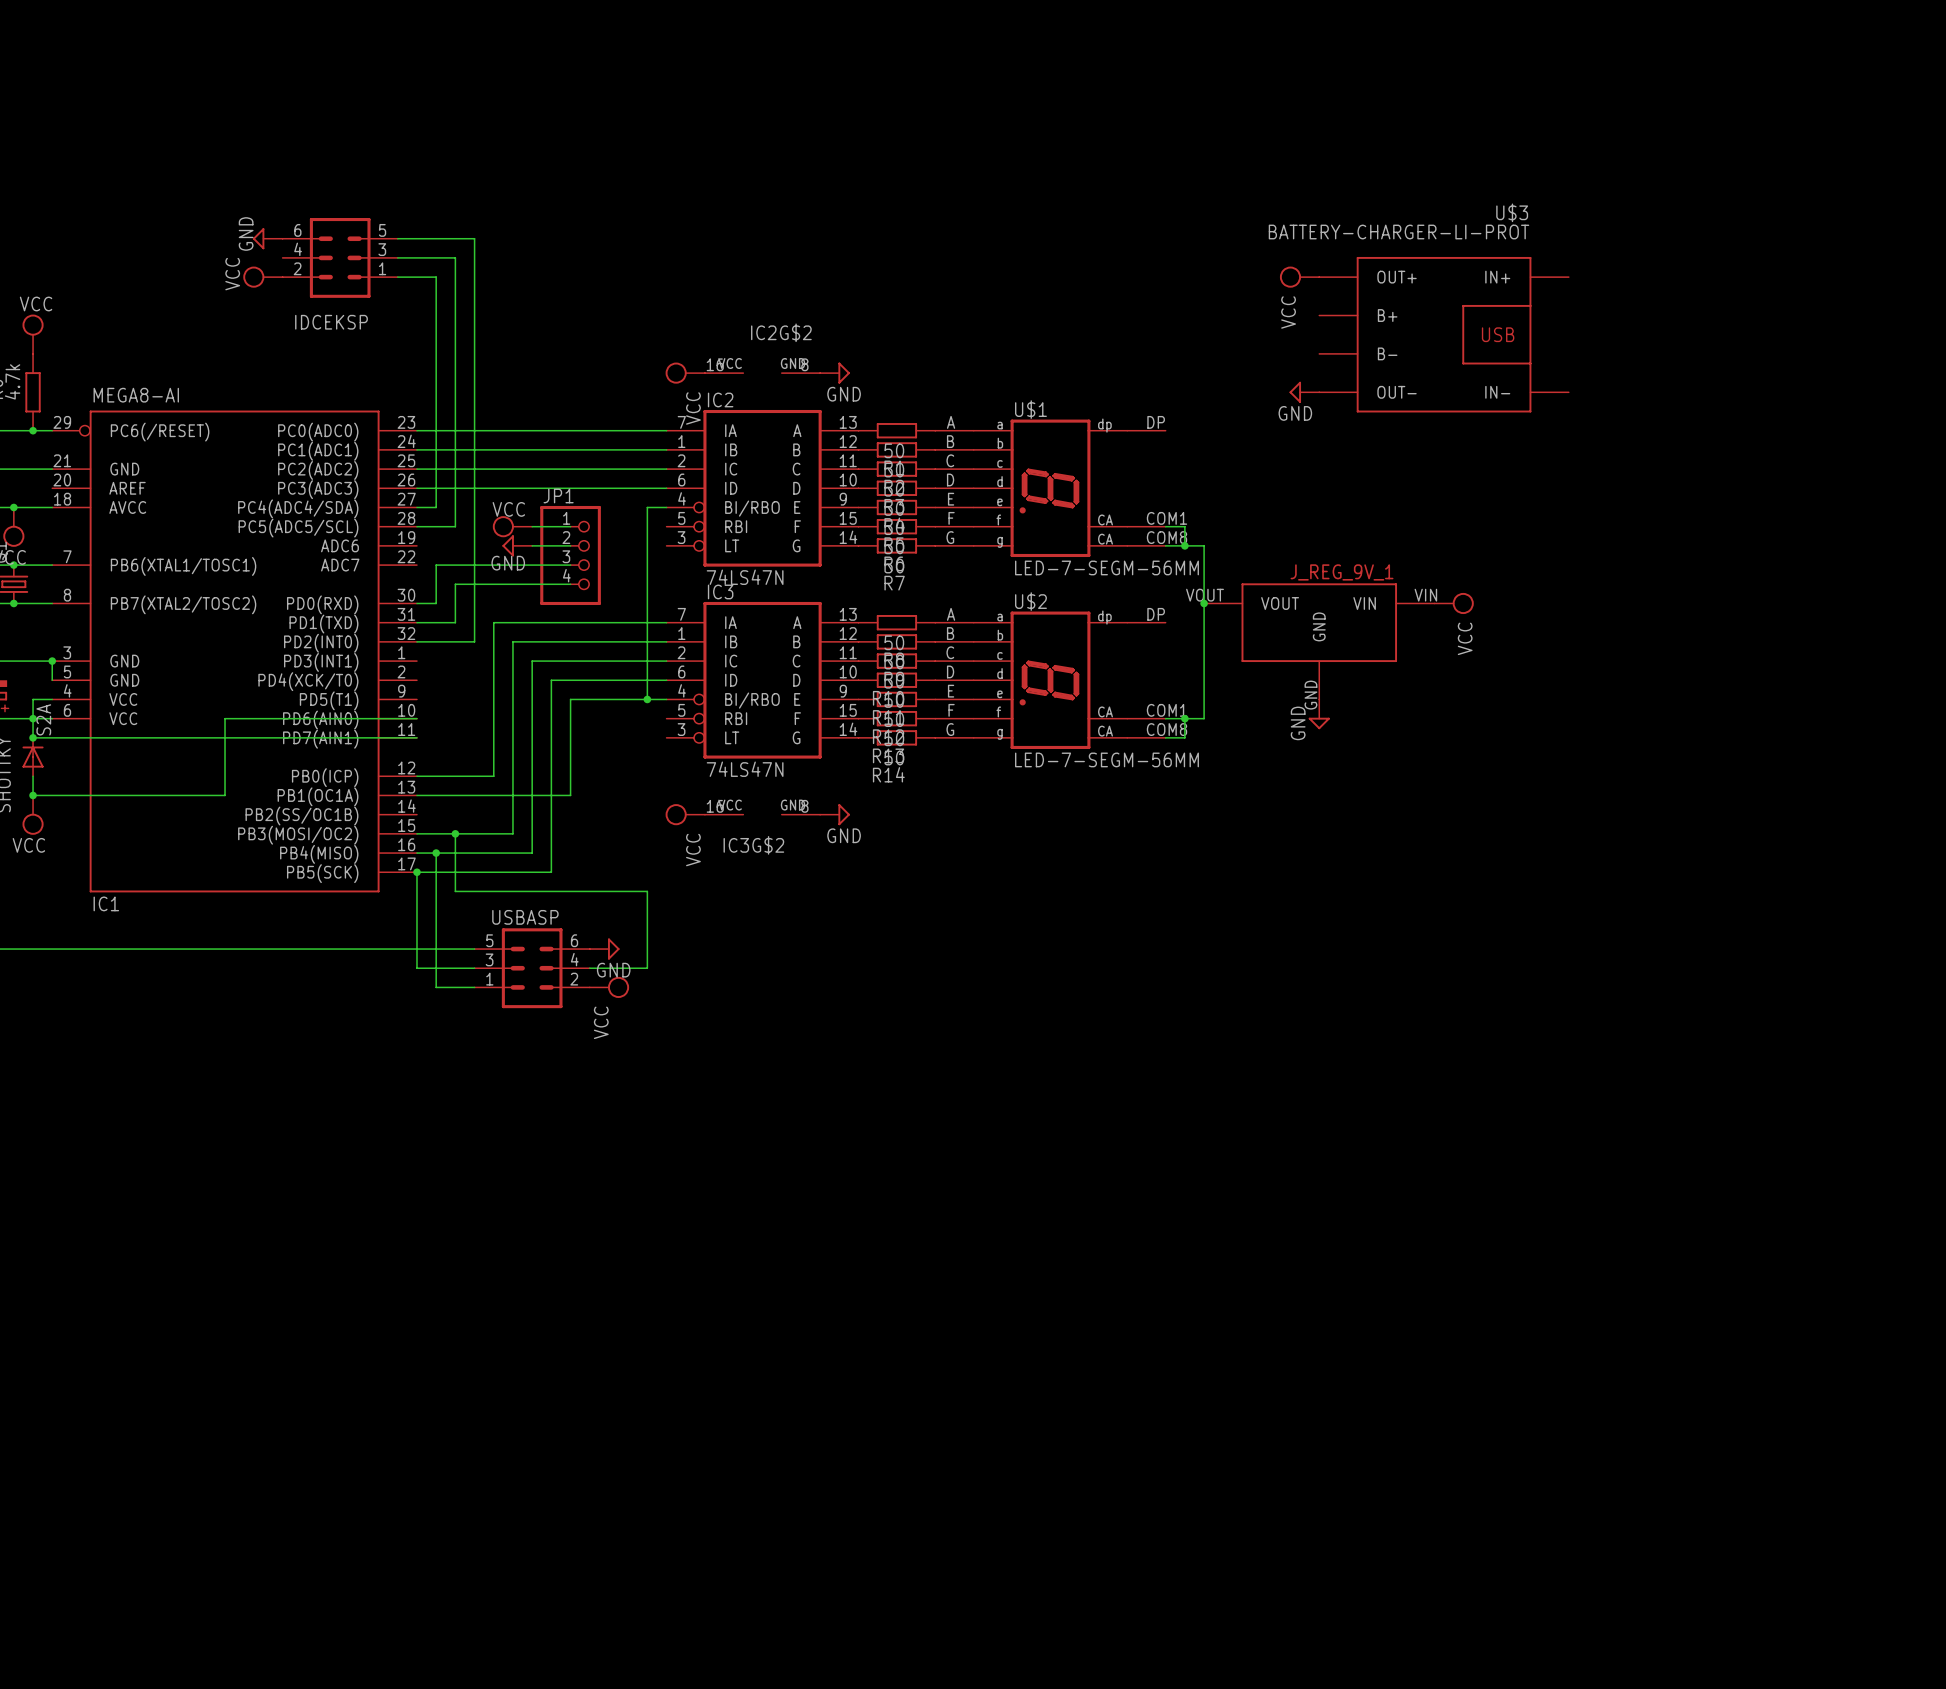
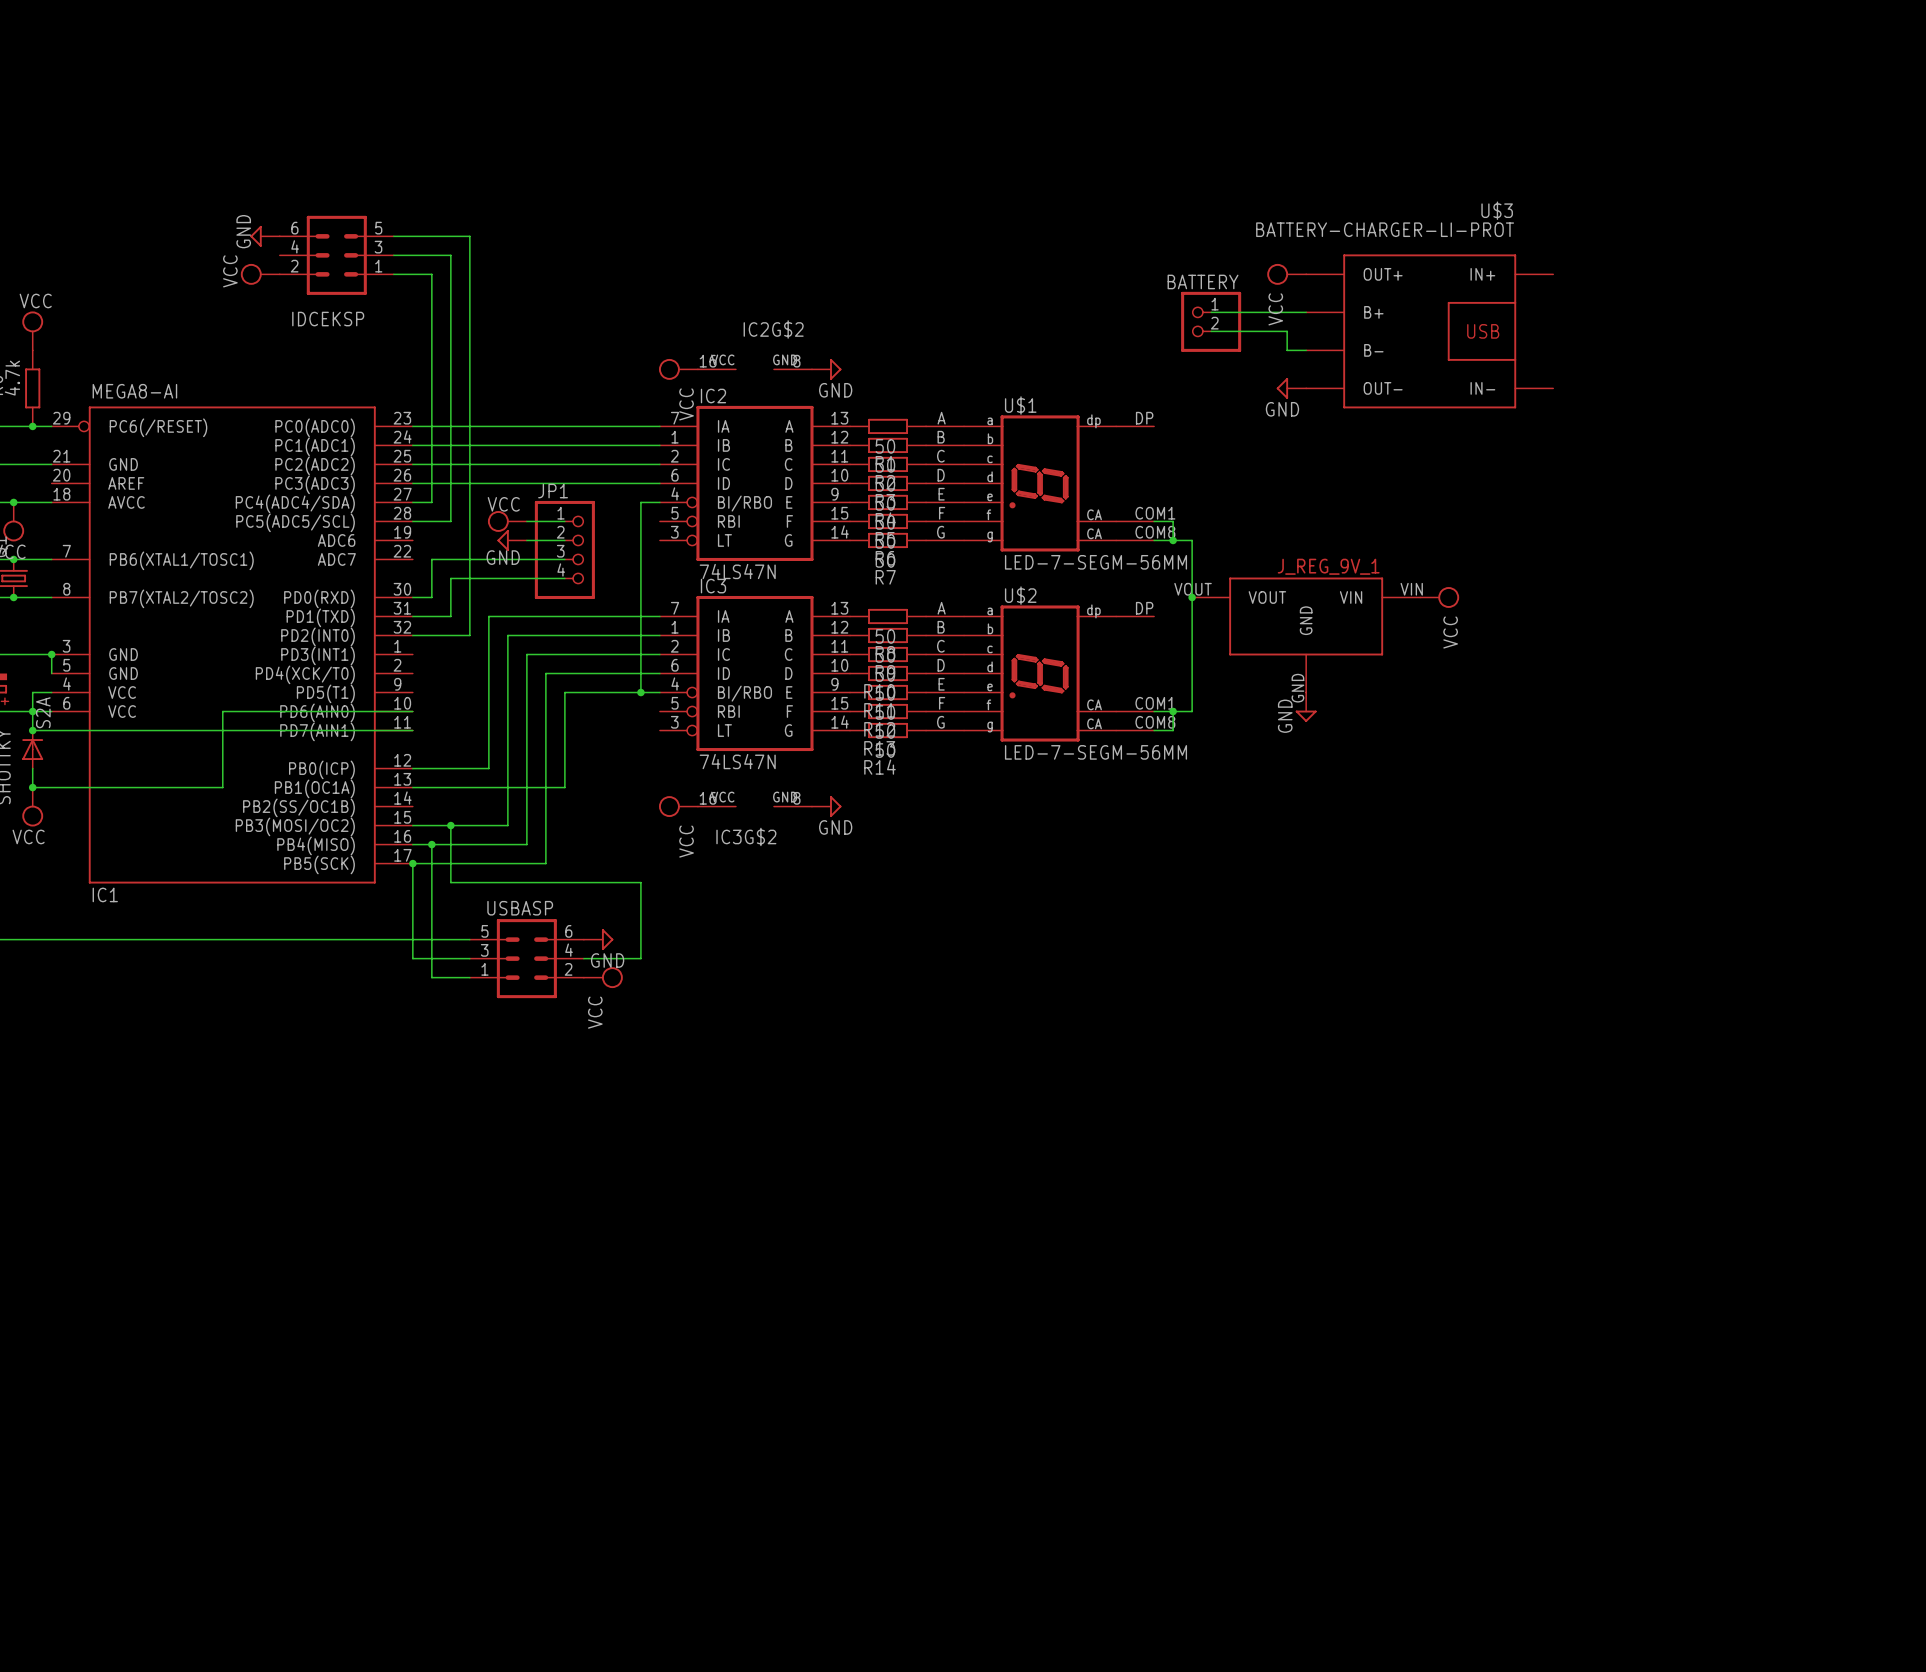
wire: none -> (1211, 312) (1306, 312)
BATTERY: none -> (1211, 321)
wire: none -> (1211, 331) (1287, 331) (1287, 350) (1306, 350)

